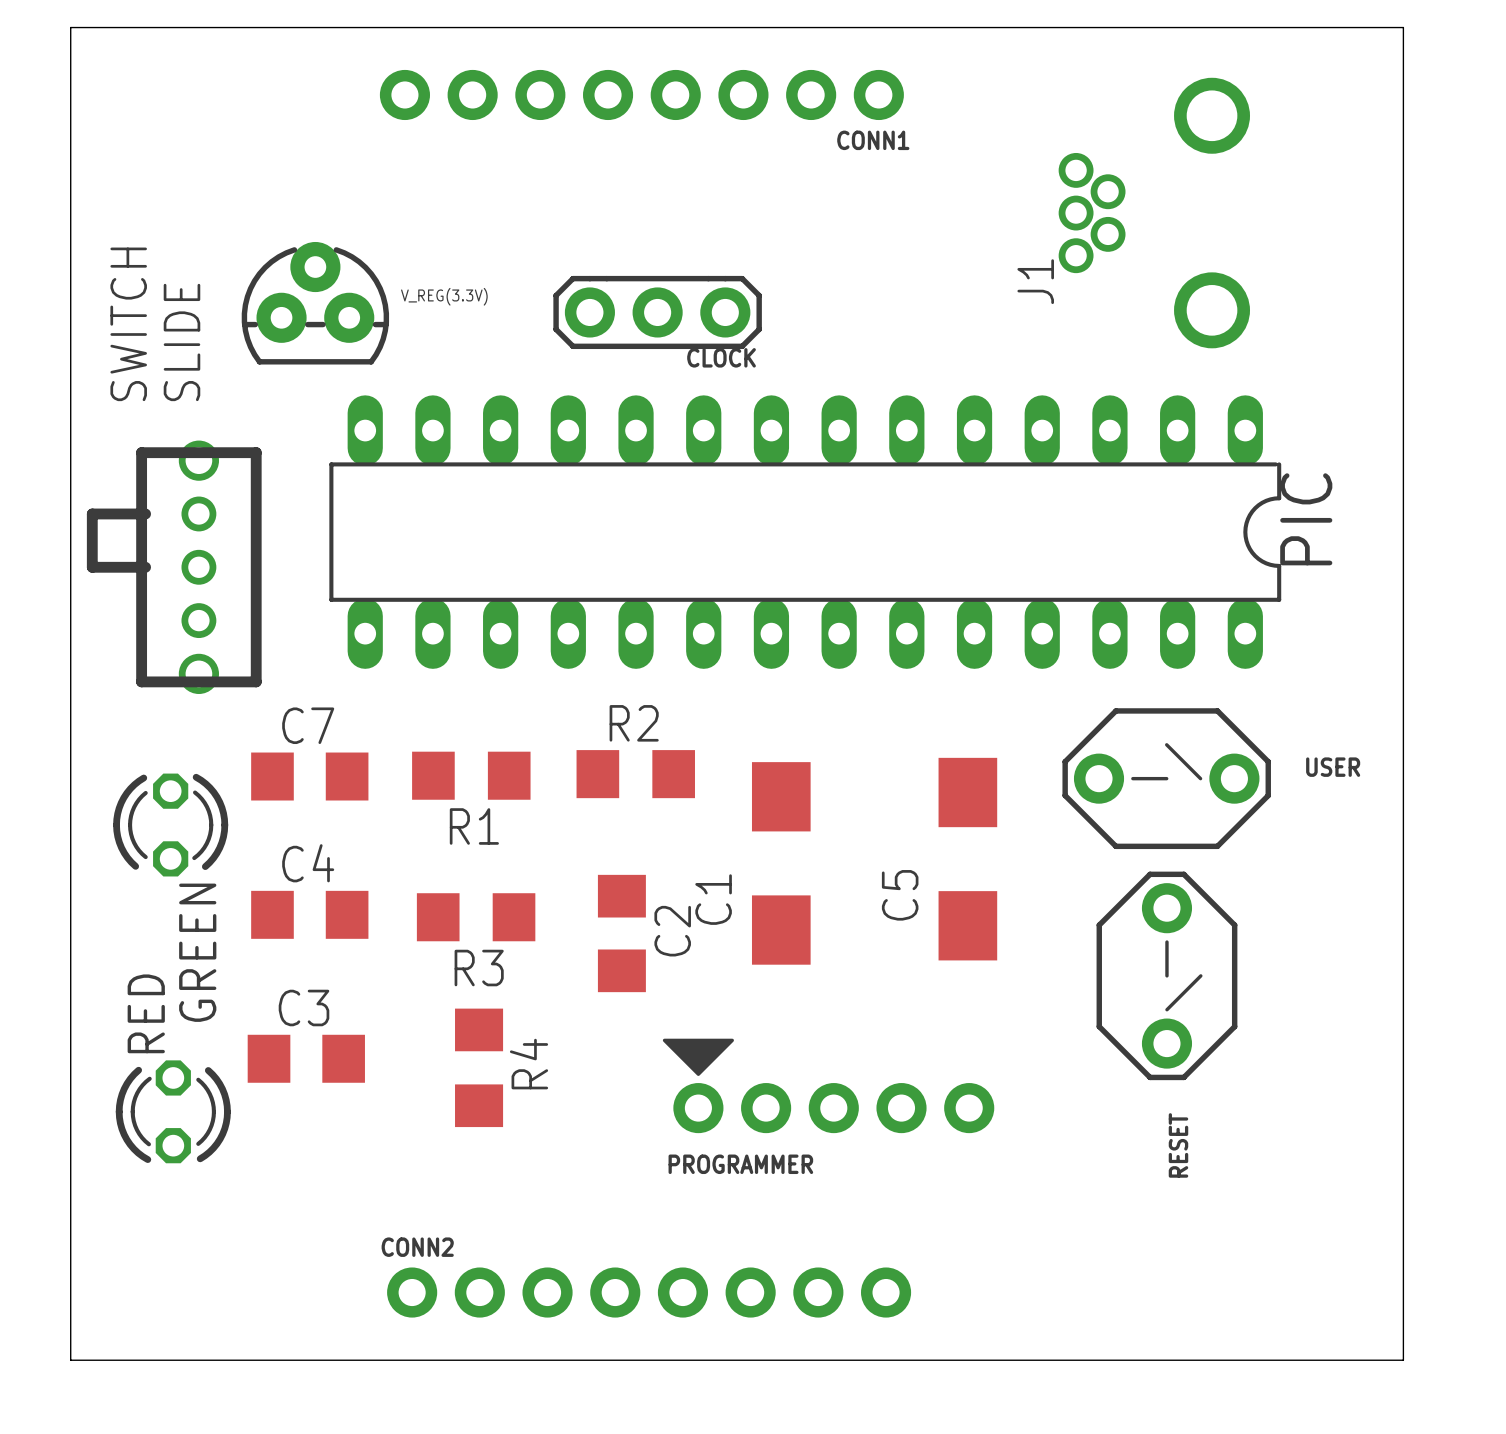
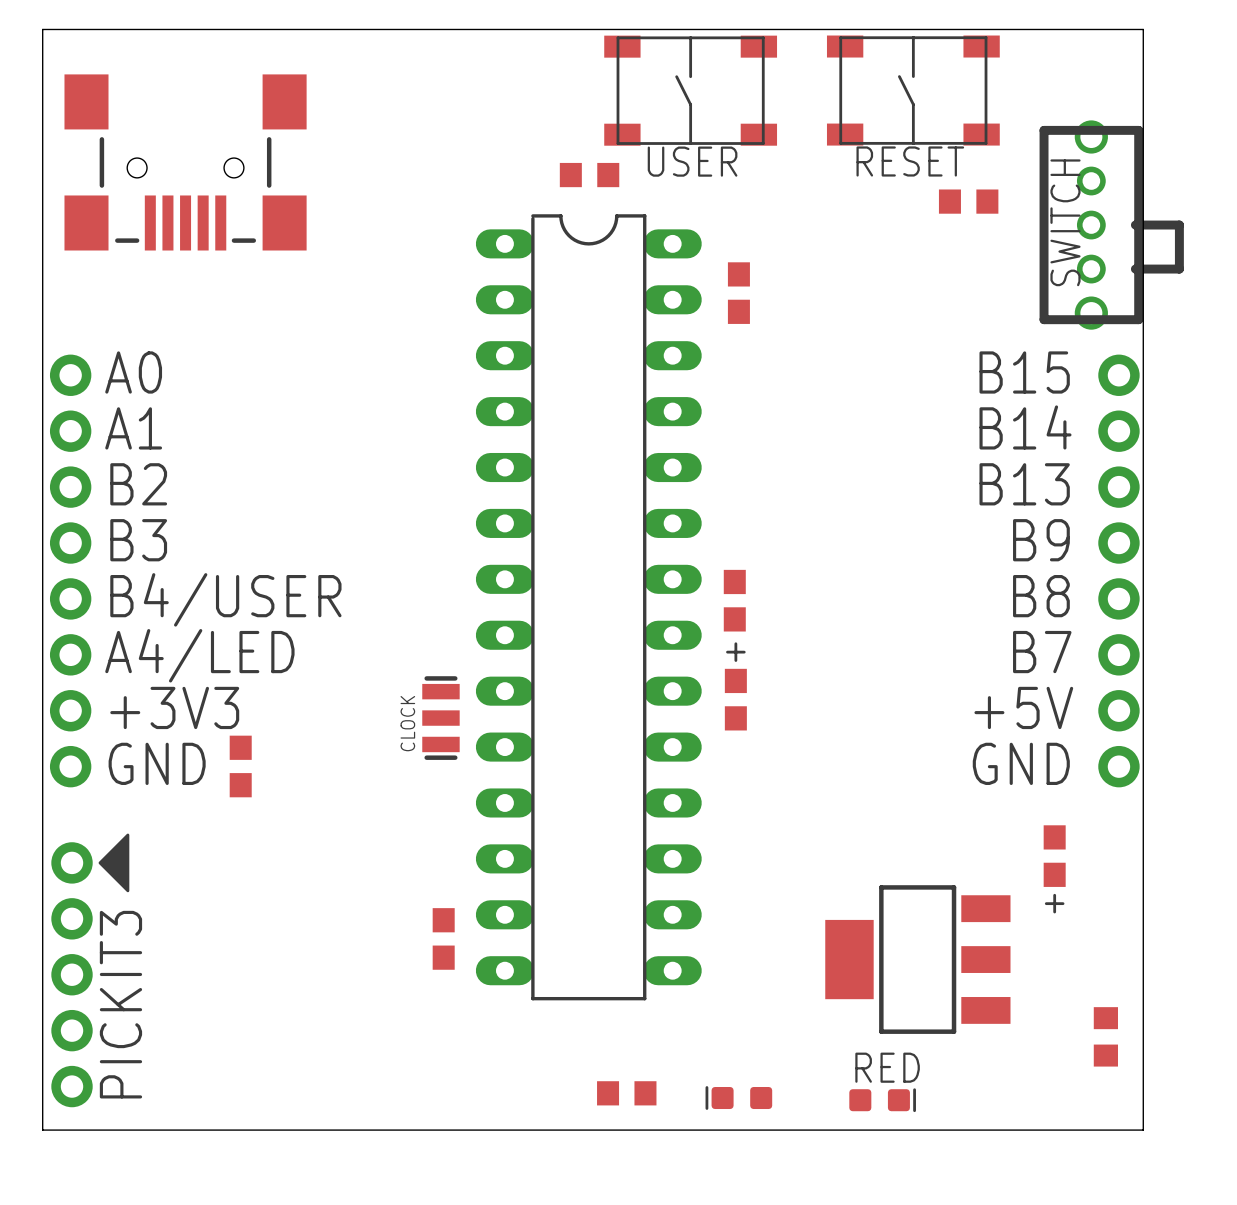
CONN1: (641, 94) -> none
USER: none -> (690, 90)
RESET: none -> (913, 90)
part: none -> (185, 162)
part: none -> (589, 175)
J1: (1154, 213) -> none
part: none -> (968, 201)
SWITCH: none -> (1111, 225)
V_REG(3.3V): (315, 303) -> none
CLOCK: (657, 312) -> none
part: none -> (738, 293)
text: none -> A0 (133, 372)
text: none -> B15 (1024, 372)
text: none -> B14 (1025, 427)
text: none -> A1 (133, 428)
PIC: (805, 532) -> none
SWITCH: SLIDE (174, 567) -> none
text: none -> B2 (138, 484)
text: none -> B13 (1024, 484)
text: none -> B3 (138, 540)
text: none -> B9 (1041, 540)
part: none -> (70, 570)
part: none -> (1118, 570)
text: none -> B8 (1041, 596)
text: none -> B4/USER (225, 599)
part: none -> (734, 600)
part: none -> (588, 607)
R2: (635, 774) -> none
R1: (471, 775) -> none
C7: (309, 776) -> none
USER: (1166, 778) -> none
text: none -> B7 (1042, 652)
text: none -> A4/LED (199, 655)
part: none -> (735, 686)
GREEN: (170, 825) -> none
text: none -> +3V3 (174, 707)
text: none -> +5V (1023, 707)
C5: (967, 859) -> none
CLOCK: none -> (440, 718)
C1: (781, 863) -> none
C4: (309, 914) -> none
text: none -> GND (157, 763)
text: none -> GND (1021, 763)
R3: (476, 917) -> none
part: none -> (240, 766)
C2: (621, 933) -> none
RESET: (1166, 975) -> none
part: none -> (1054, 869)
C3: (306, 1058) -> none
R4: (479, 1067) -> none
PROGRAMMER: (828, 1085) -> none
RED: (173, 1111) -> none
part: none -> (443, 938)
part: none -> (917, 959)
part: none -> (90, 970)
text: none -> PICKIT3 (120, 1004)
part: none -> (1105, 1036)
CONN2: (649, 1292) -> none
part: none -> (626, 1093)
part: none -> (738, 1098)
RED: none -> (882, 1100)

